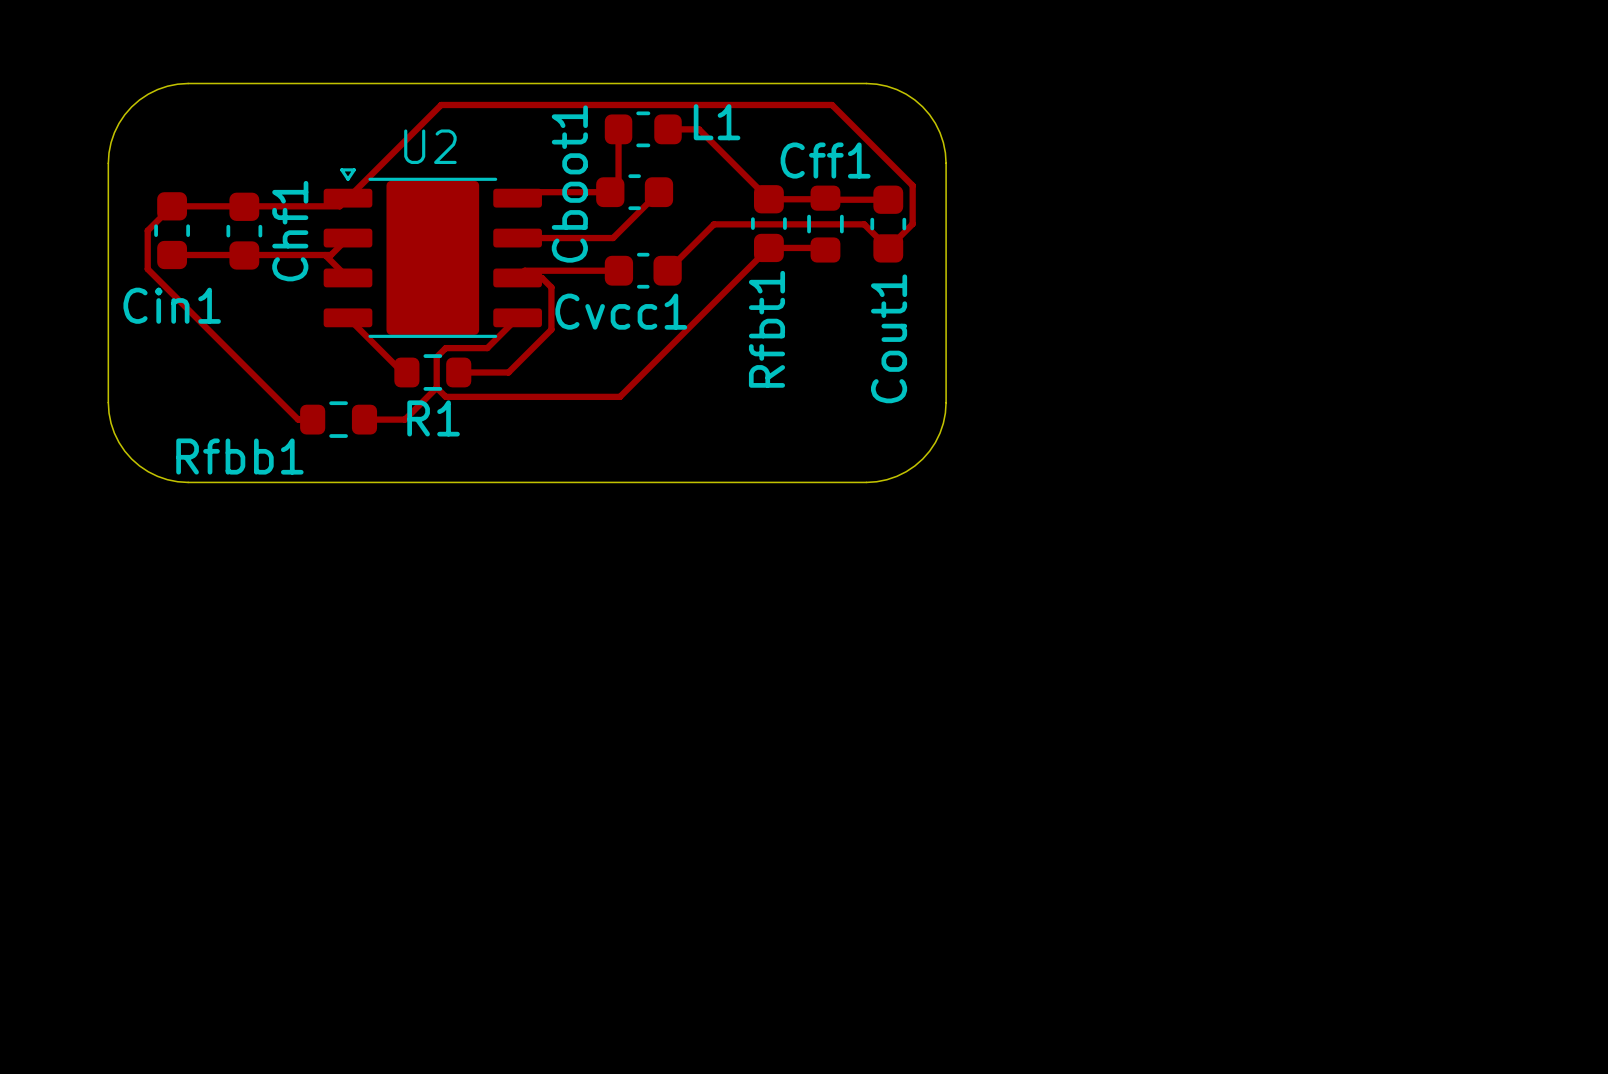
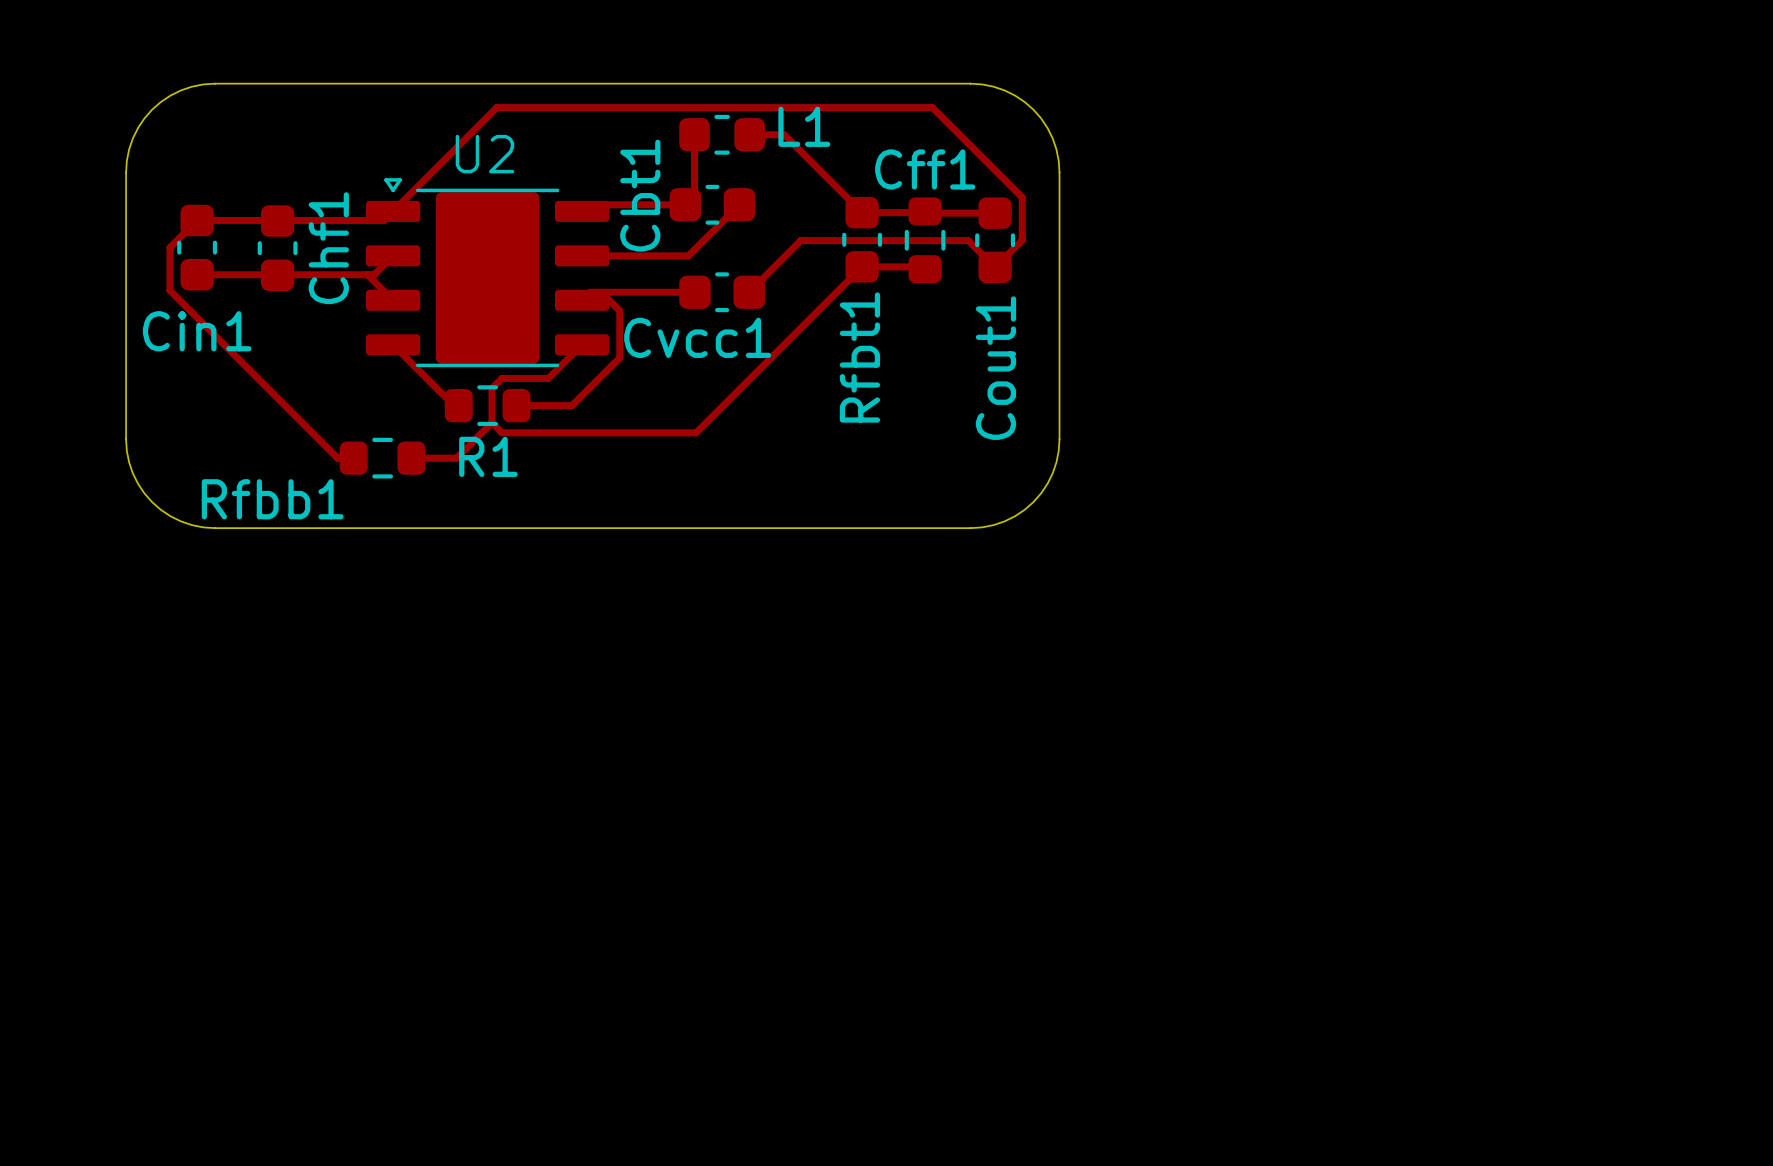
Cboot1 name: Cboot1 (569, 184) -> Cbt1 (640, 195)

